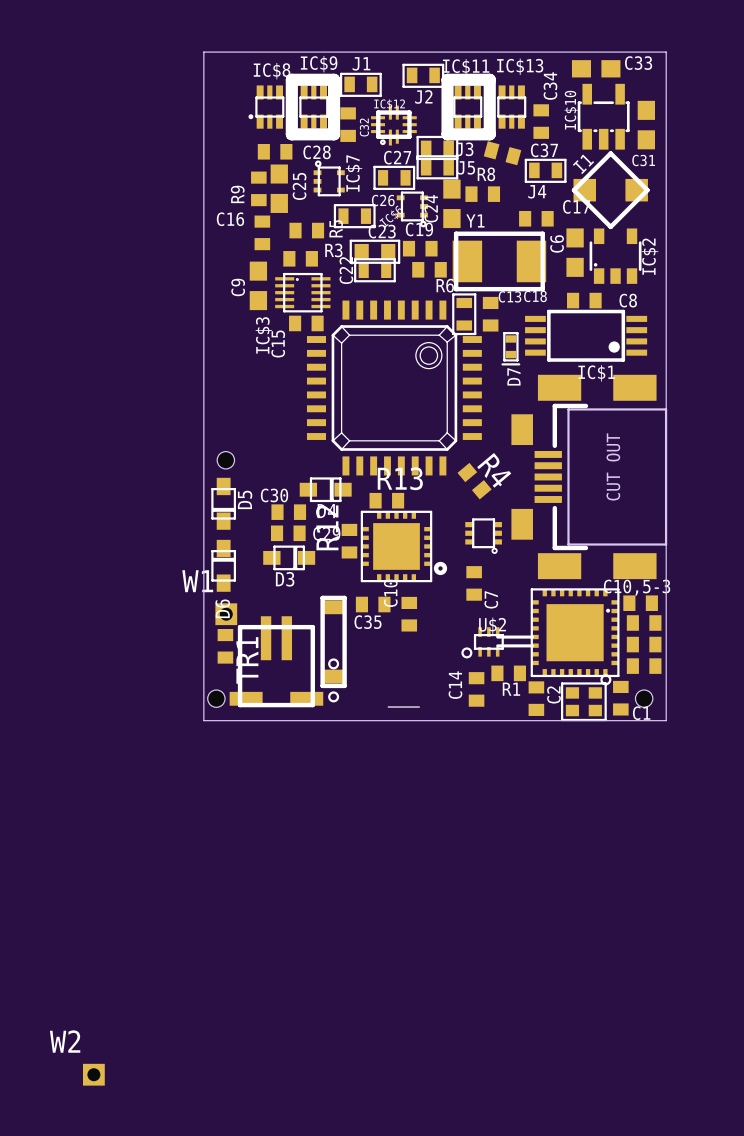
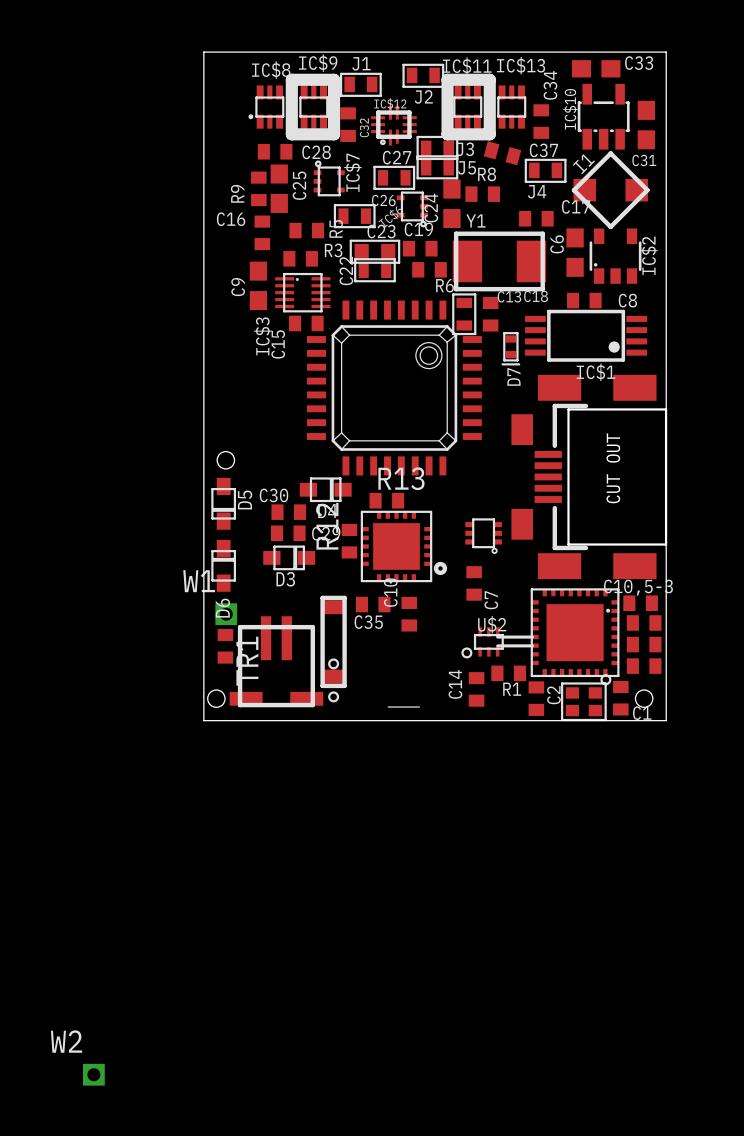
R4: (474, 481) -> none

